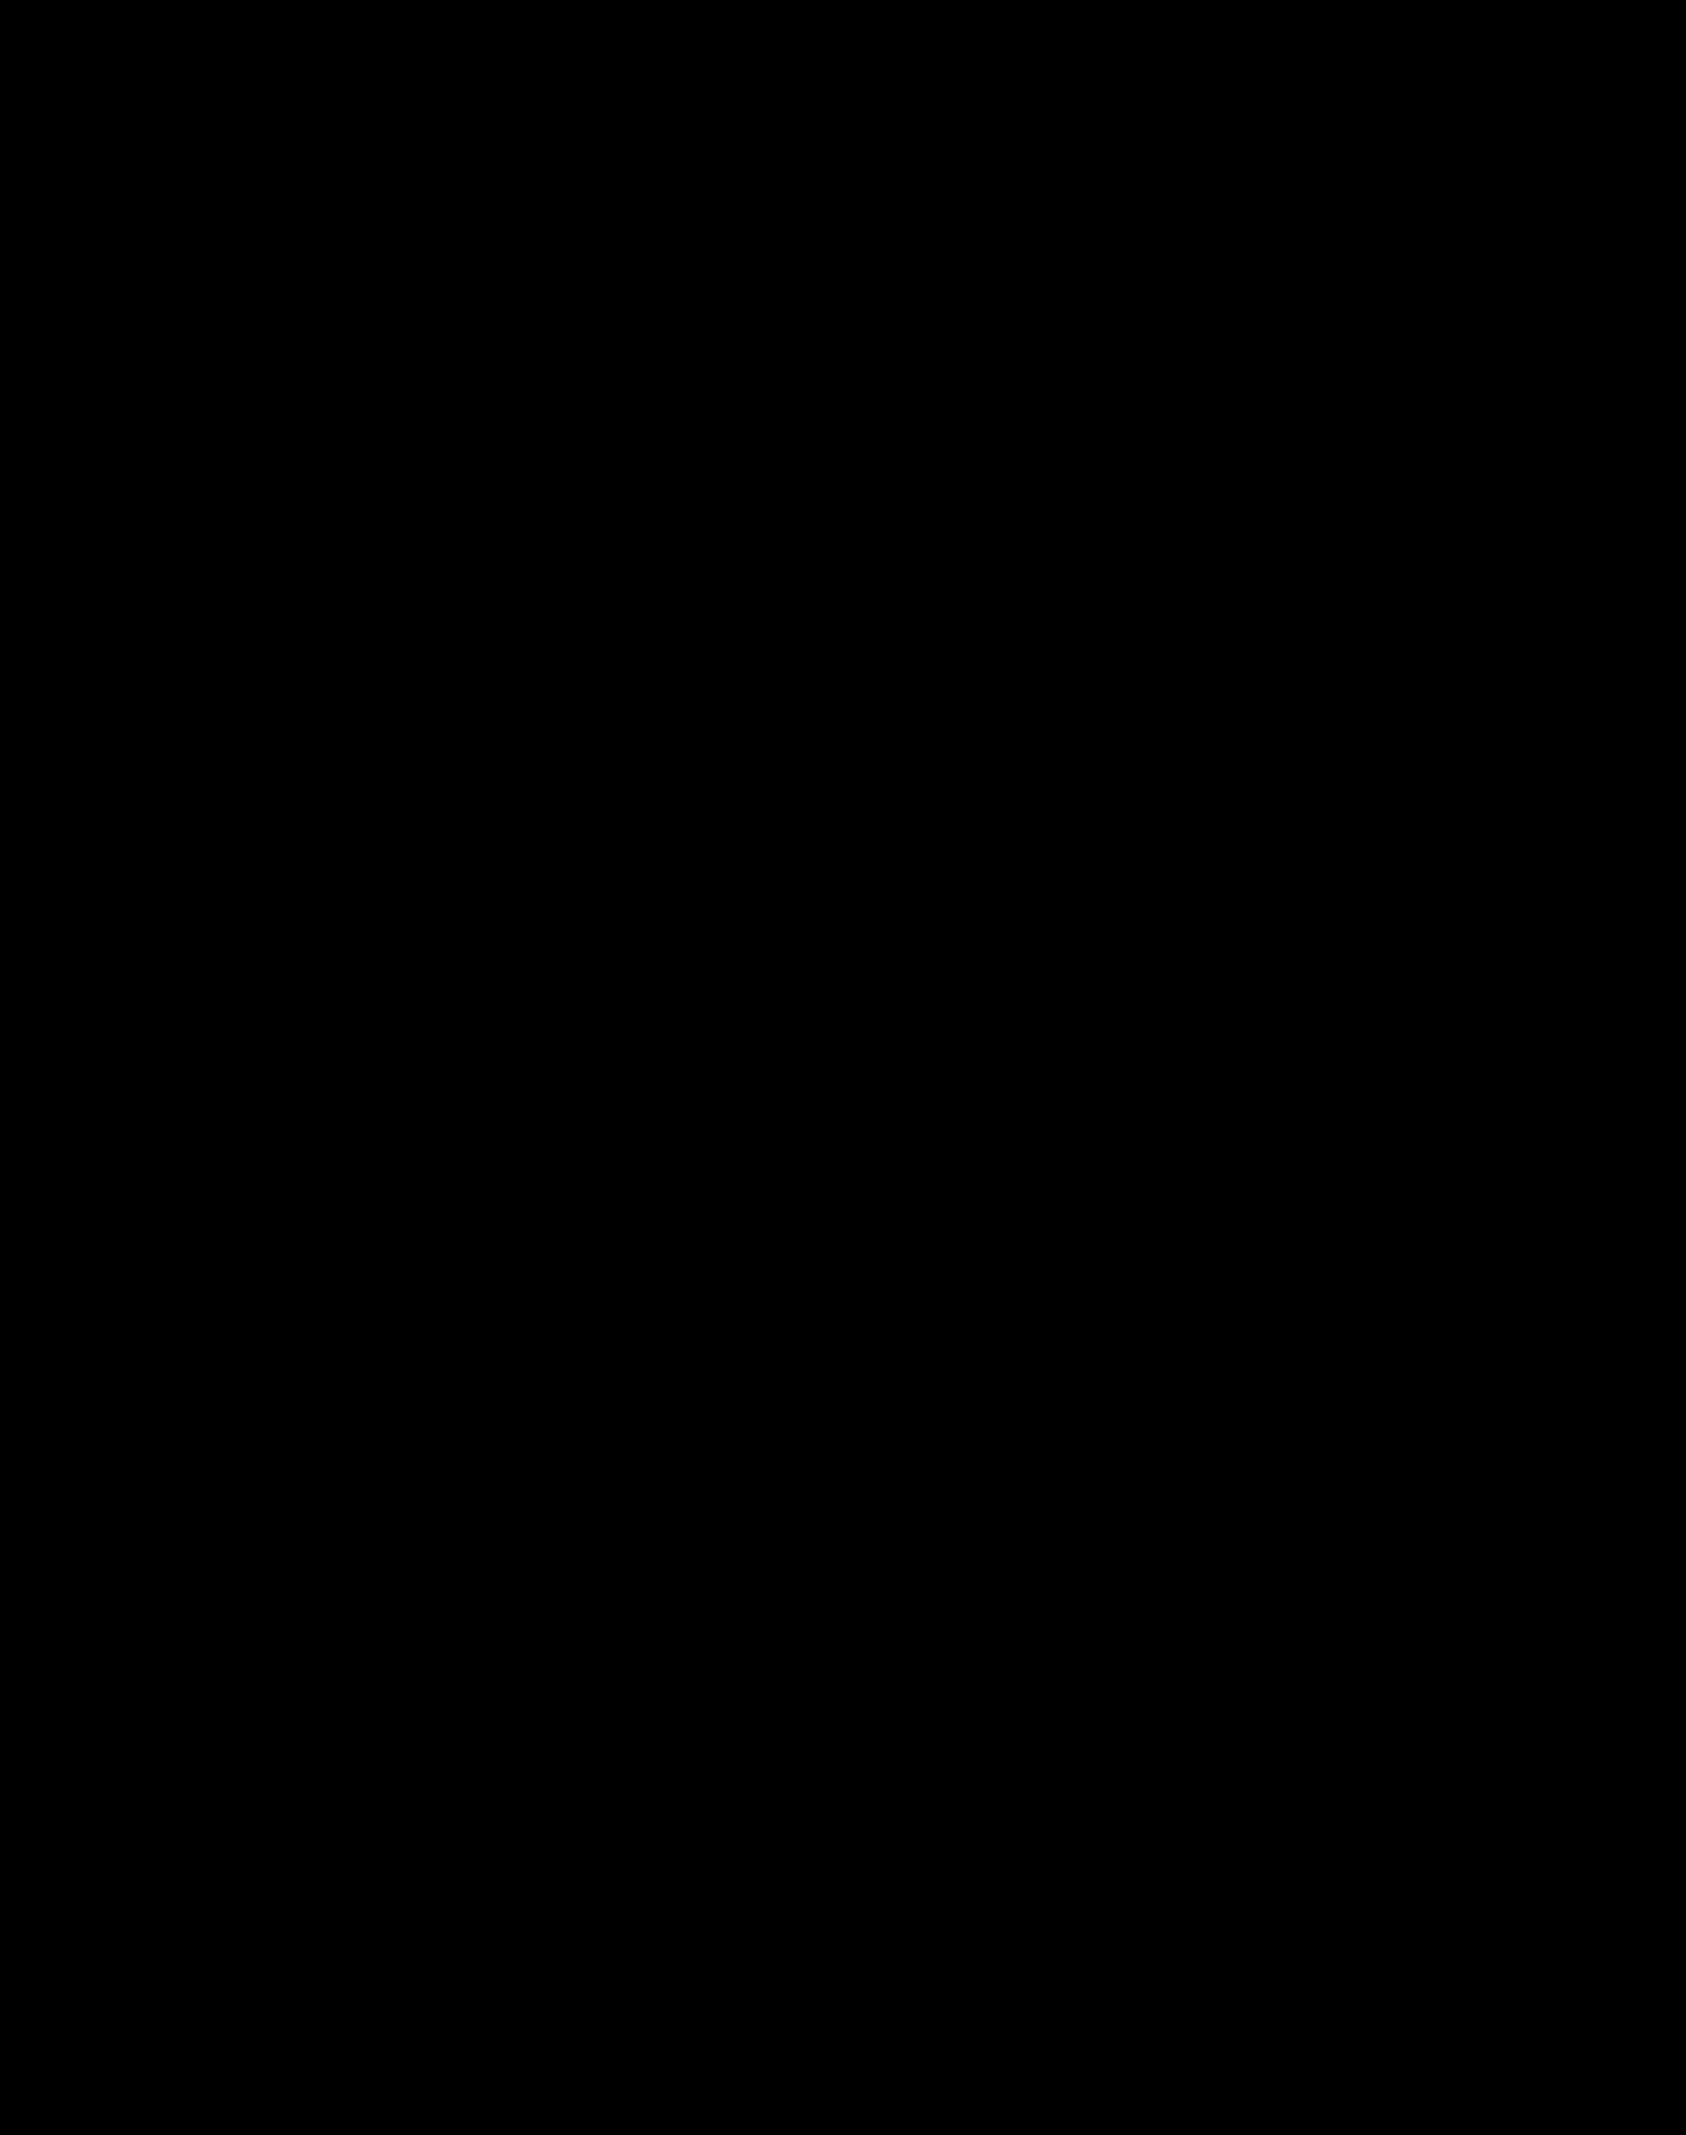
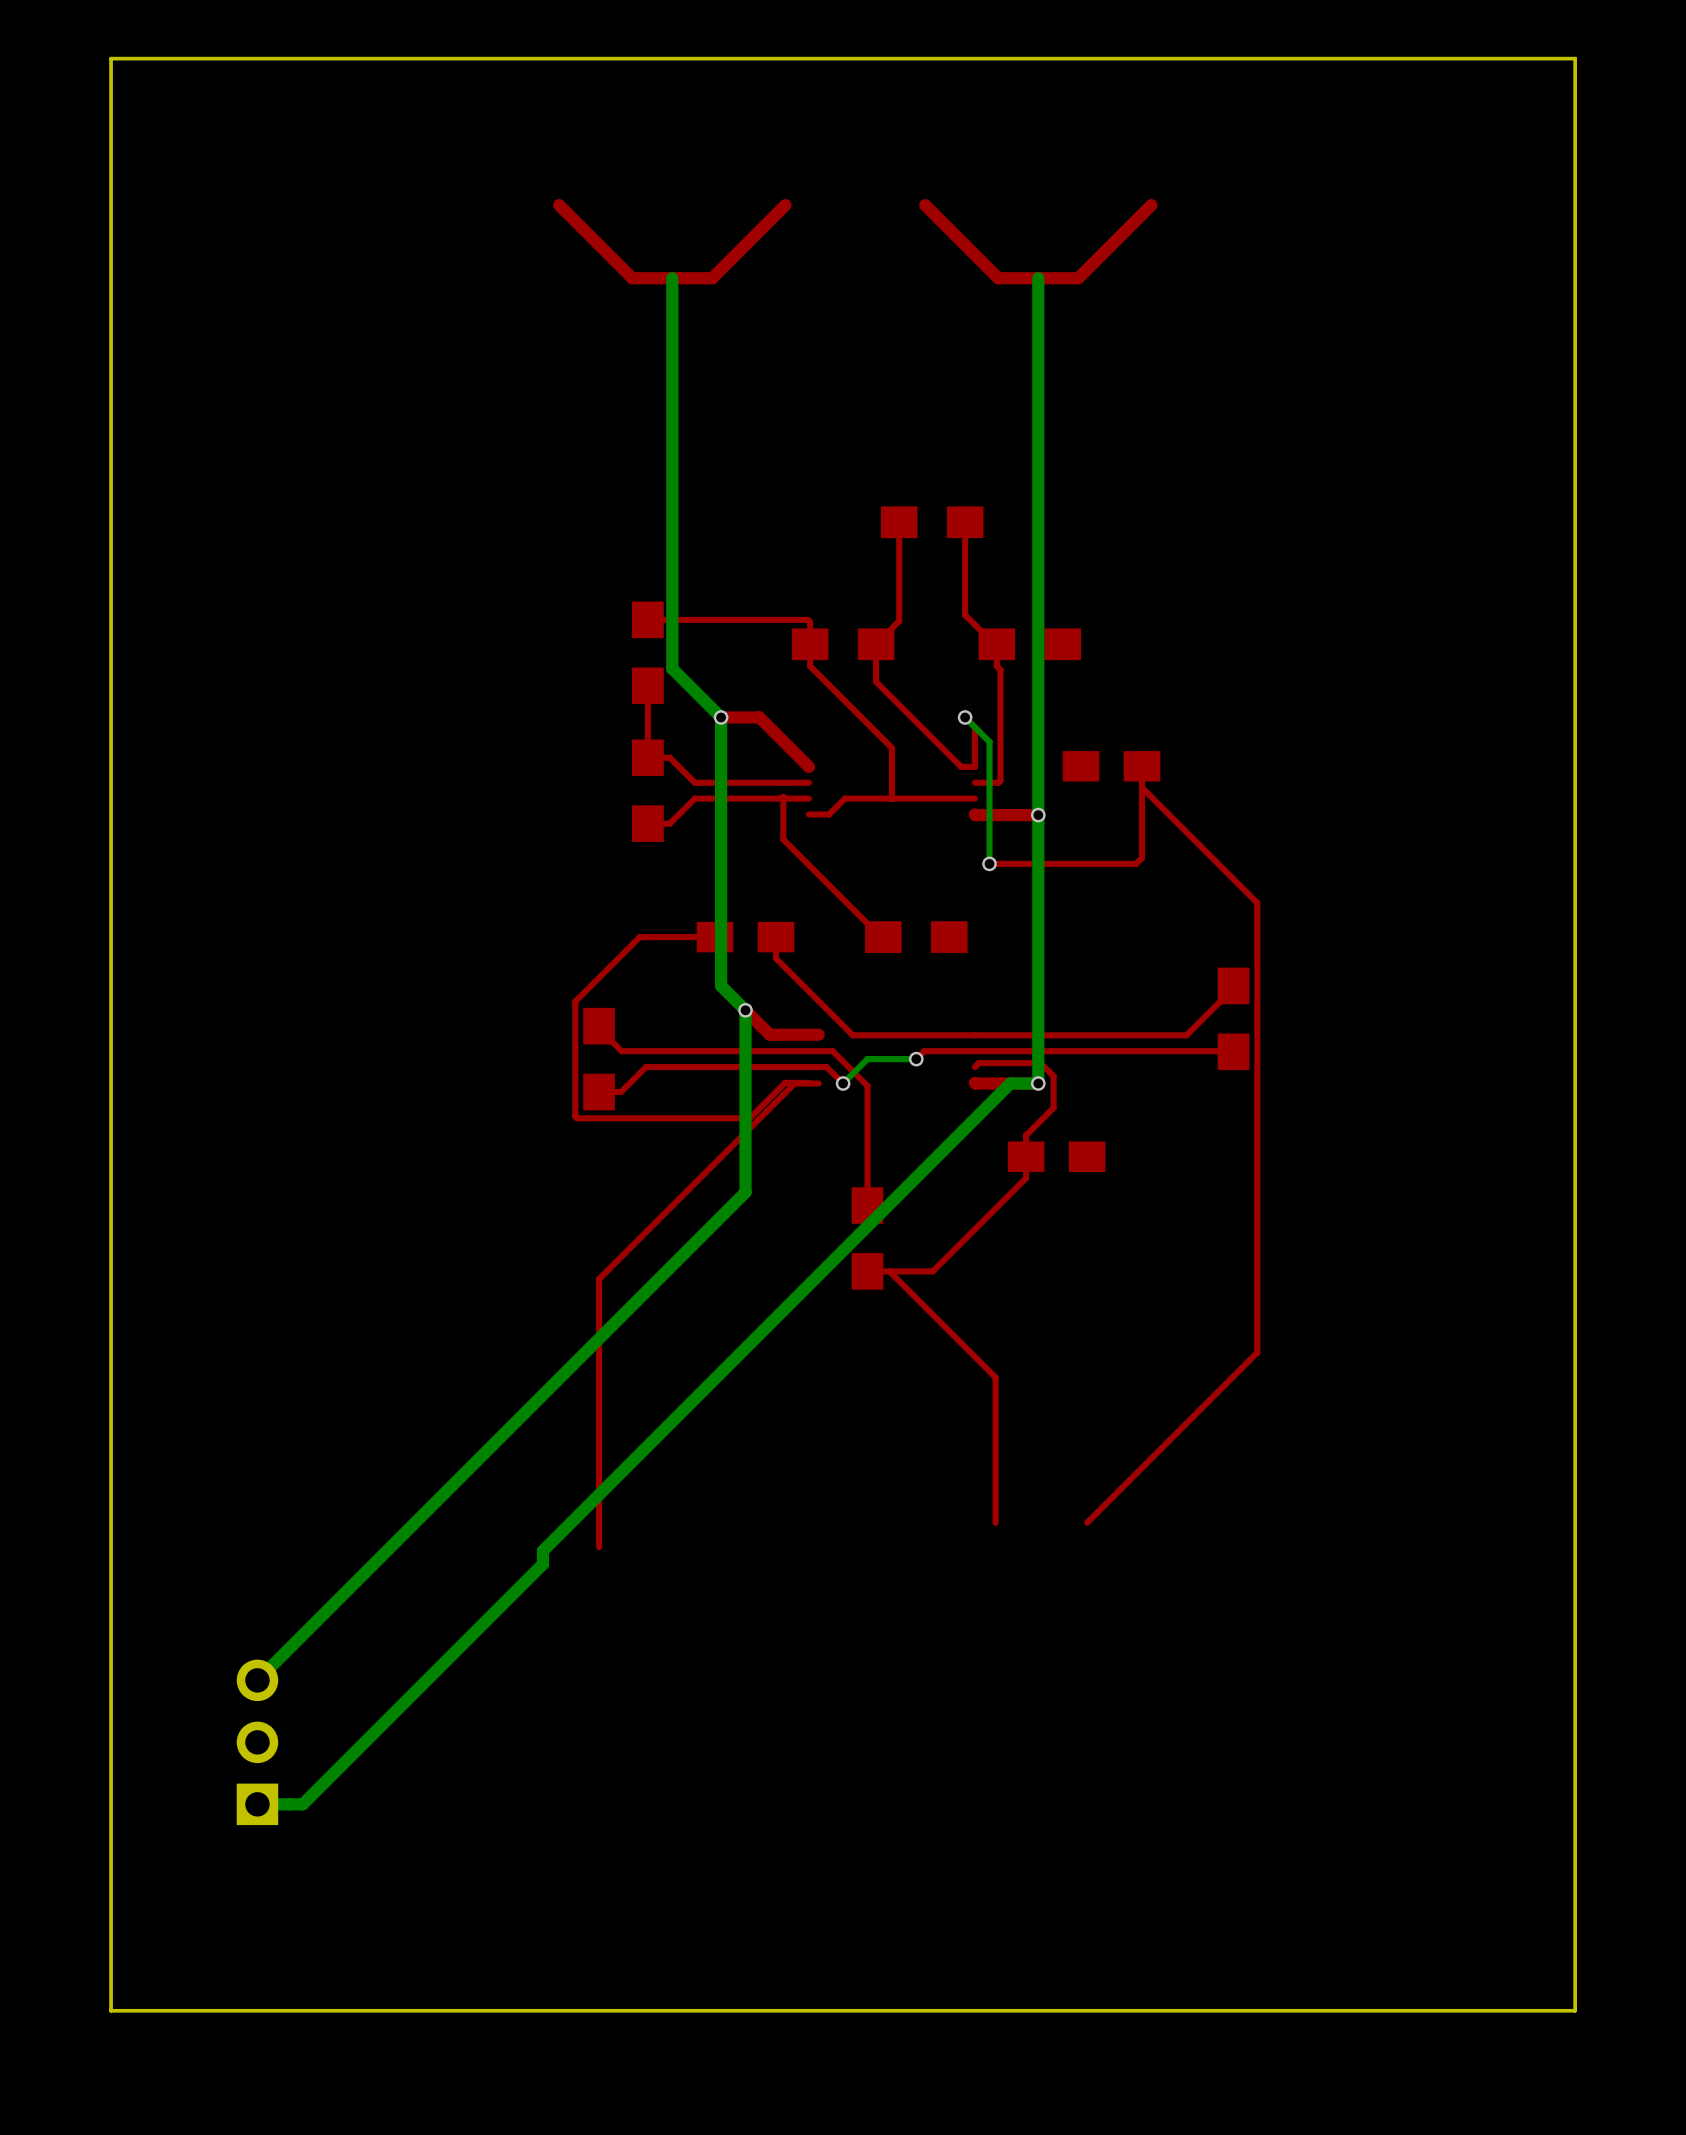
board edge: none -> (1575, 58) (1575, 2010) (111, 2010) (111, 58) (1575, 58)
top track: none -> (785, 205) (712, 278) (632, 278) (559, 205)
top track: none -> (1151, 205) (1078, 278) (998, 278) (925, 205)
bottom track: none -> (672, 278) (672, 668) (721, 717) (721, 985) (745, 1010) (745, 1192) (257, 1680)
bottom track: none -> (1038, 278) (1038, 1083) (1010, 1083) (542, 1550) (542, 1564) (302, 1804) (257, 1804)
top track: none -> (899, 522) (899, 621) (876, 644) (876, 681) (961, 766) (974, 766) (974, 727) (965, 717)
part: none -> (932, 522)
top track: none -> (965, 522) (965, 614) (994, 644) (996, 644) (996, 666) (1000, 669) (1000, 780) (998, 782) (974, 782)
top track: none -> (647, 619) (807, 619) (810, 622) (810, 666) (891, 747) (891, 798)
part: none -> (843, 644)
part: none -> (1029, 644)
part: none -> (647, 652)
top track: none -> (647, 685) (647, 757) (669, 757) (694, 782) (808, 782)
top track: none -> (721, 717) (759, 717) (808, 766)
via: none -> (721, 717)
bottom track: none -> (965, 717) (989, 741) (989, 863)
via: none -> (965, 717)
part: none -> (1111, 766)
top track: none -> (1142, 766) (1142, 857) (1135, 863) (989, 863)
top track: none -> (1142, 787) (1257, 902) (1257, 1352) (1087, 1522)
part: none -> (647, 790)
top track: none -> (785, 798) (783, 796) (783, 839) (880, 937) (883, 937)
top track: none -> (808, 798) (694, 798) (669, 823) (647, 823)
top track: none -> (974, 798) (844, 798) (829, 814) (808, 814)
top track: none -> (974, 814) (1038, 815)
via: none -> (1038, 815)
via: none -> (989, 863)
top track: none -> (715, 937) (639, 937) (575, 1001) (575, 1116) (576, 1118) (749, 1118) (785, 1082) (808, 1082)
part: none -> (745, 937)
top track: none -> (776, 937) (776, 958) (852, 1035) (1186, 1035) (1233, 988) (1233, 985)
part: none -> (916, 937)
top track: none -> (745, 1010) (769, 1034) (818, 1034)
via: none -> (745, 1010)
part: none -> (1233, 1018)
top track: none -> (599, 1026) (599, 1028) (621, 1051) (832, 1051) (867, 1085) (867, 1205)
top track: none -> (1233, 1051) (924, 1051) (916, 1059)
part: none -> (599, 1059)
bottom track: none -> (916, 1059) (867, 1059) (843, 1083)
via: none -> (916, 1059)
top track: none -> (974, 1067) (978, 1063) (1040, 1063) (1053, 1076) (1053, 1107) (1026, 1135) (1026, 1178) (932, 1271) (867, 1271)
top track: none -> (974, 1082) (1038, 1083)
top track: none -> (818, 1083) (794, 1083) (599, 1279) (599, 1547)
top track: none -> (843, 1083) (826, 1067) (646, 1067) (621, 1092) (599, 1092)
via: none -> (843, 1083)
via: none -> (1038, 1083)
part: none -> (1056, 1156)
part: none -> (867, 1238)
top track: none -> (889, 1271) (995, 1377) (995, 1522)
part: none -> (257, 1742)

